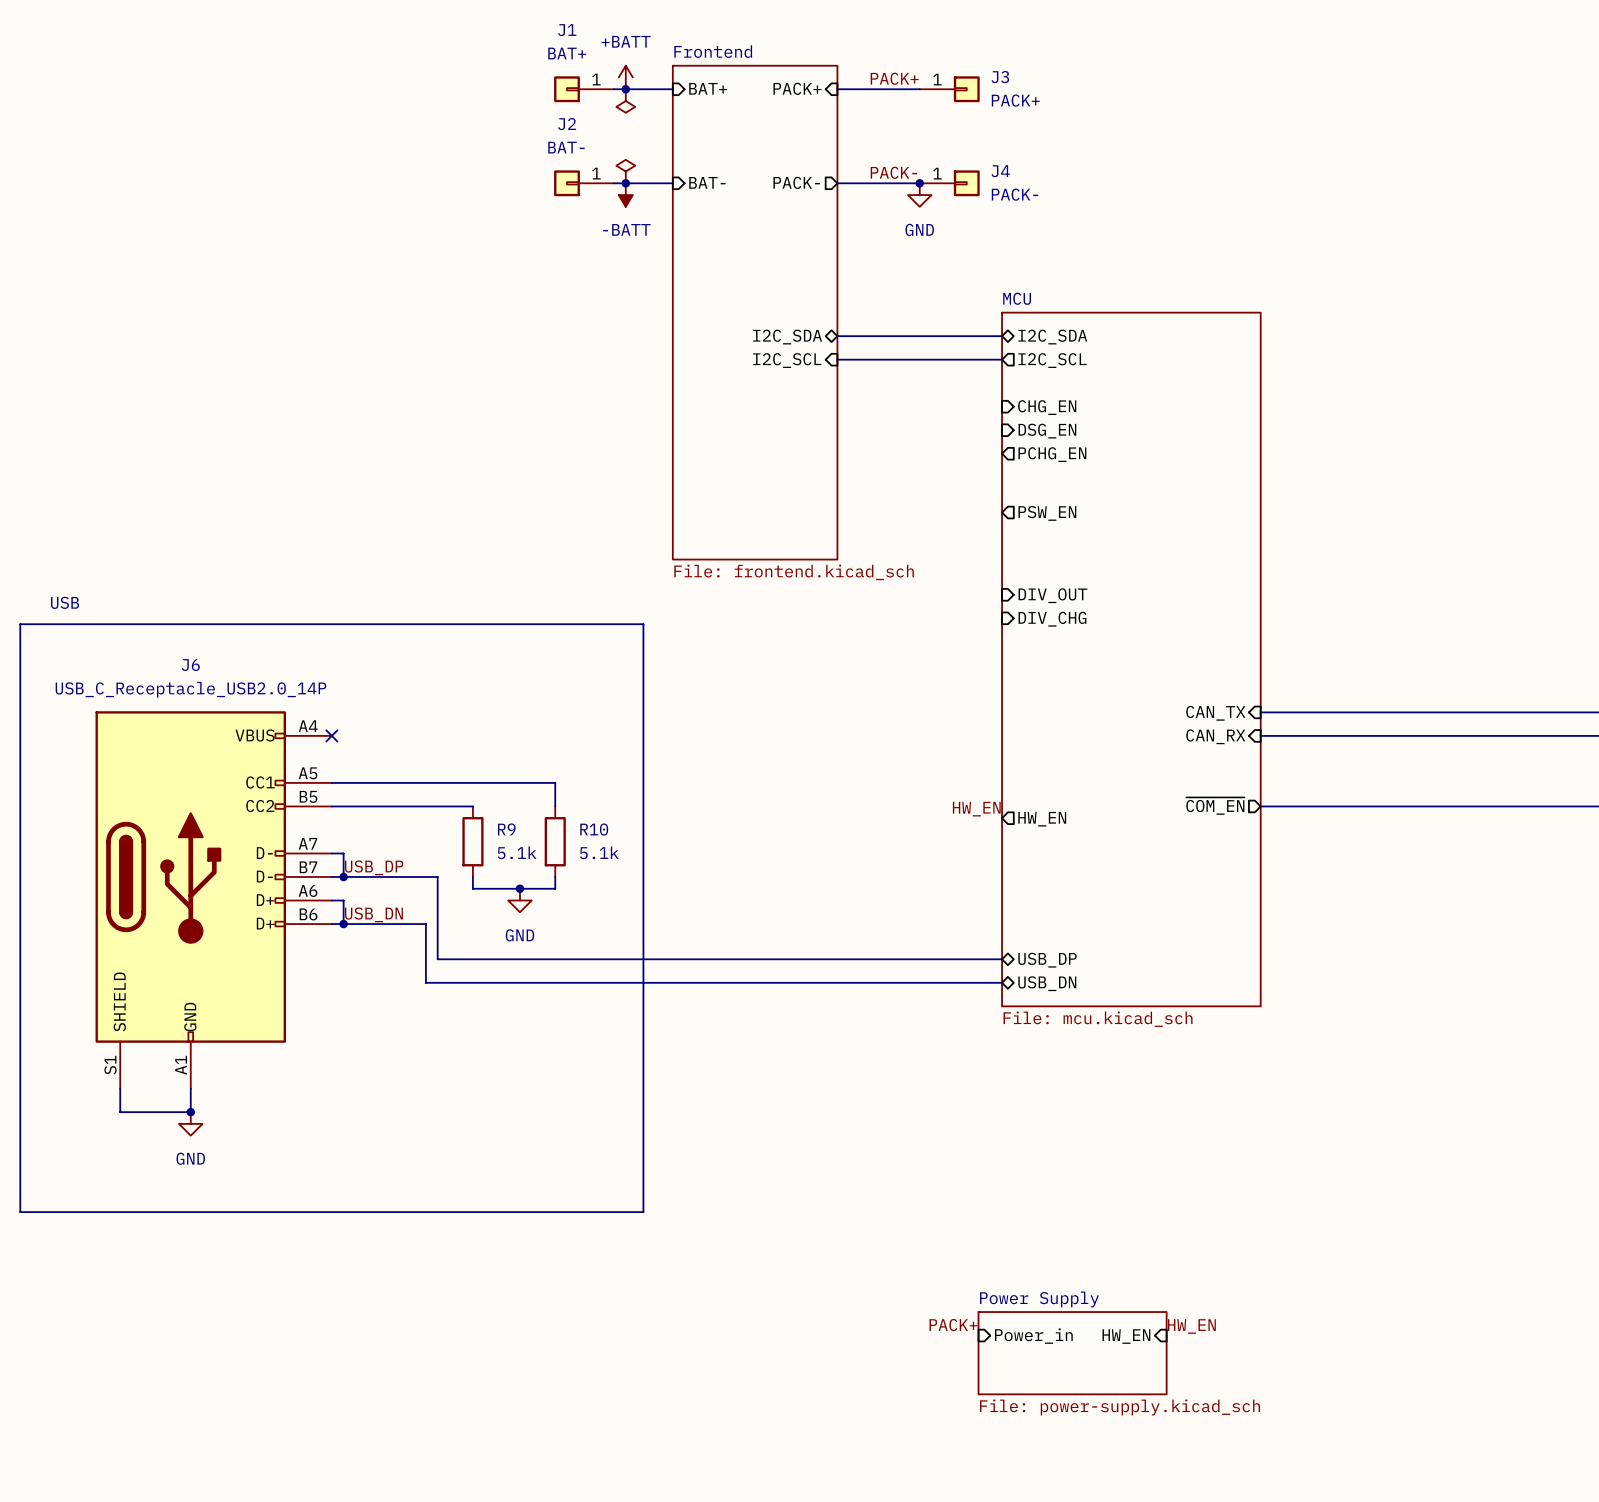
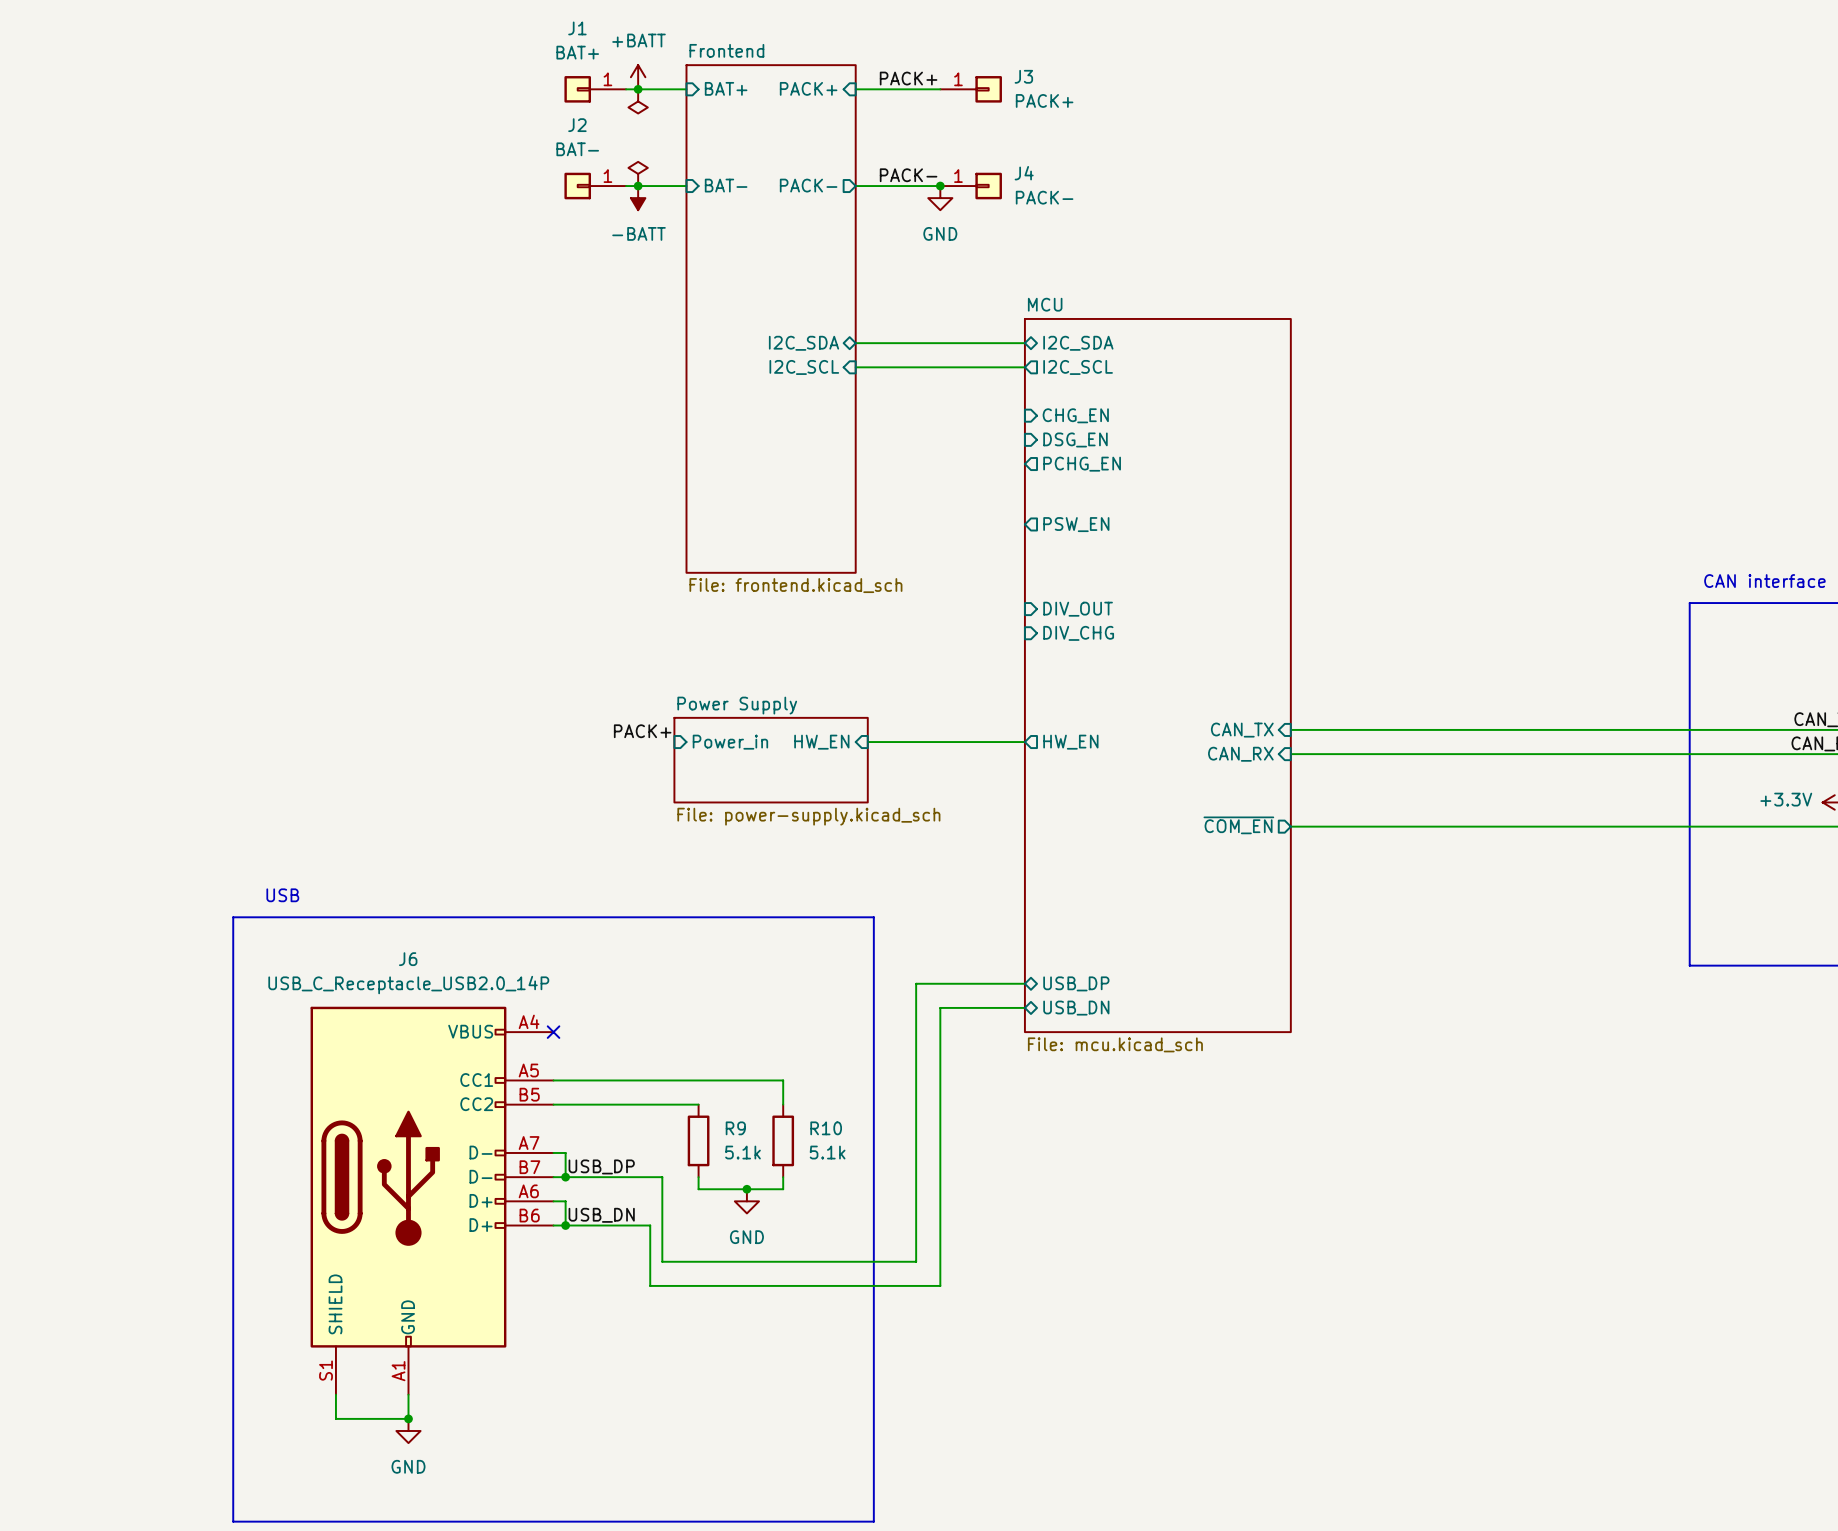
text: USB (65, 602) -> none
line: (20, 624) (20, 1212) (643, 1212) (643, 624) (20, 624) -> none
label: none -> PACK+ (642, 731)
sheet pin: none -> Power_in (730, 742)
wire: none -> (867, 742) (1024, 742)
sheet pin: none -> HW_EN (821, 742)
no-connect mark: (331, 735) -> none
sheet Power Supply: none -> File: power-supply.kicad_sch (771, 760)
wire: (331, 782) (555, 782) (555, 806) -> none
wire: (331, 806) (472, 806) -> none
label: HW_EN (976, 809) -> none
sheet pin position: HW_EN (1042, 819) -> HW_EN (1070, 742)
R9 position: (472, 841) -> (698, 1140)
R10 position: (555, 841) -> (783, 1140)
wire: (331, 853) (343, 853) (343, 877) -> none
label: USB_DP (374, 867) -> none
text: none -> USB (282, 895)
wire: (331, 877) (437, 877) (437, 959) (896, 959) -> (553, 1177) (662, 1177) (662, 1261) (916, 1261) (916, 983)
junction: (343, 877) -> none
wire: (472, 877) (472, 888) (555, 888) (555, 877) -> none
junction: (519, 888) -> none
line: none -> (233, 917) (233, 1521) (873, 1521) (873, 917) (233, 917)
J6 position: (213, 899) -> (432, 1200)
wire: (331, 900) (343, 900) (343, 924) -> none
power symbol: GND (519, 900) -> none
label: USB_DN (373, 914) -> none
wire: (331, 924) (425, 924) (425, 982) (919, 982) -> (553, 1225) (650, 1225) (650, 1285) (940, 1285) (940, 1007)
junction: (343, 924) -> none
no-connect mark: none -> (553, 1032)
wire: none -> (553, 1080) (783, 1080) (783, 1104)
wire: none -> (553, 1104) (698, 1104)
wire: (120, 1088) (120, 1112) (190, 1112) (190, 1088) -> none
junction: (190, 1112) -> none
power symbol: GND (190, 1123) -> none
wire: none -> (553, 1152) (565, 1152) (565, 1177)
label: none -> USB_DP (601, 1166)
junction: none -> (565, 1177)
wire: none -> (698, 1177) (698, 1189) (783, 1189) (783, 1177)
junction: none -> (746, 1189)
wire: none -> (553, 1201) (565, 1201) (565, 1225)
power symbol: none -> GND (746, 1201)
label: none -> USB_DN (601, 1215)
junction: none -> (565, 1225)
label: PACK+ (953, 1325) -> none
label: HW_EN (1191, 1326) -> none
sheet pin: Power_in (1033, 1336) -> none
sheet pin: HW_EN (1126, 1336) -> none
sheet Power Supply: File: power-supply.kicad_sch (1072, 1353) -> none
wire: none -> (335, 1394) (335, 1418) (408, 1418) (408, 1394)
junction: none -> (408, 1418)
power symbol: none -> GND (408, 1430)

